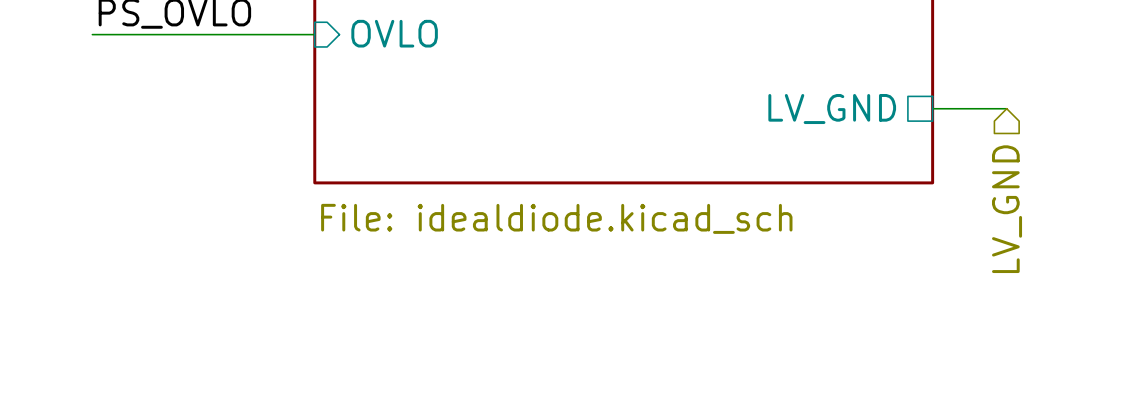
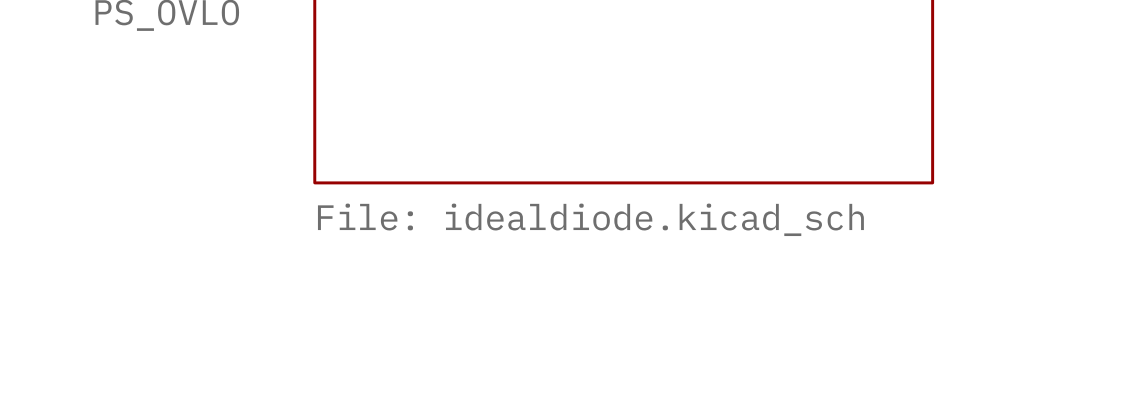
sheet pin: OVLO (394, 33) -> none
wire: (92, 34) (314, 34) -> none
wire: (932, 108) (1006, 108) -> none
sheet pin: LV_GND (832, 109) -> none
hierarchical label: LV_GND (1007, 209) -> none

